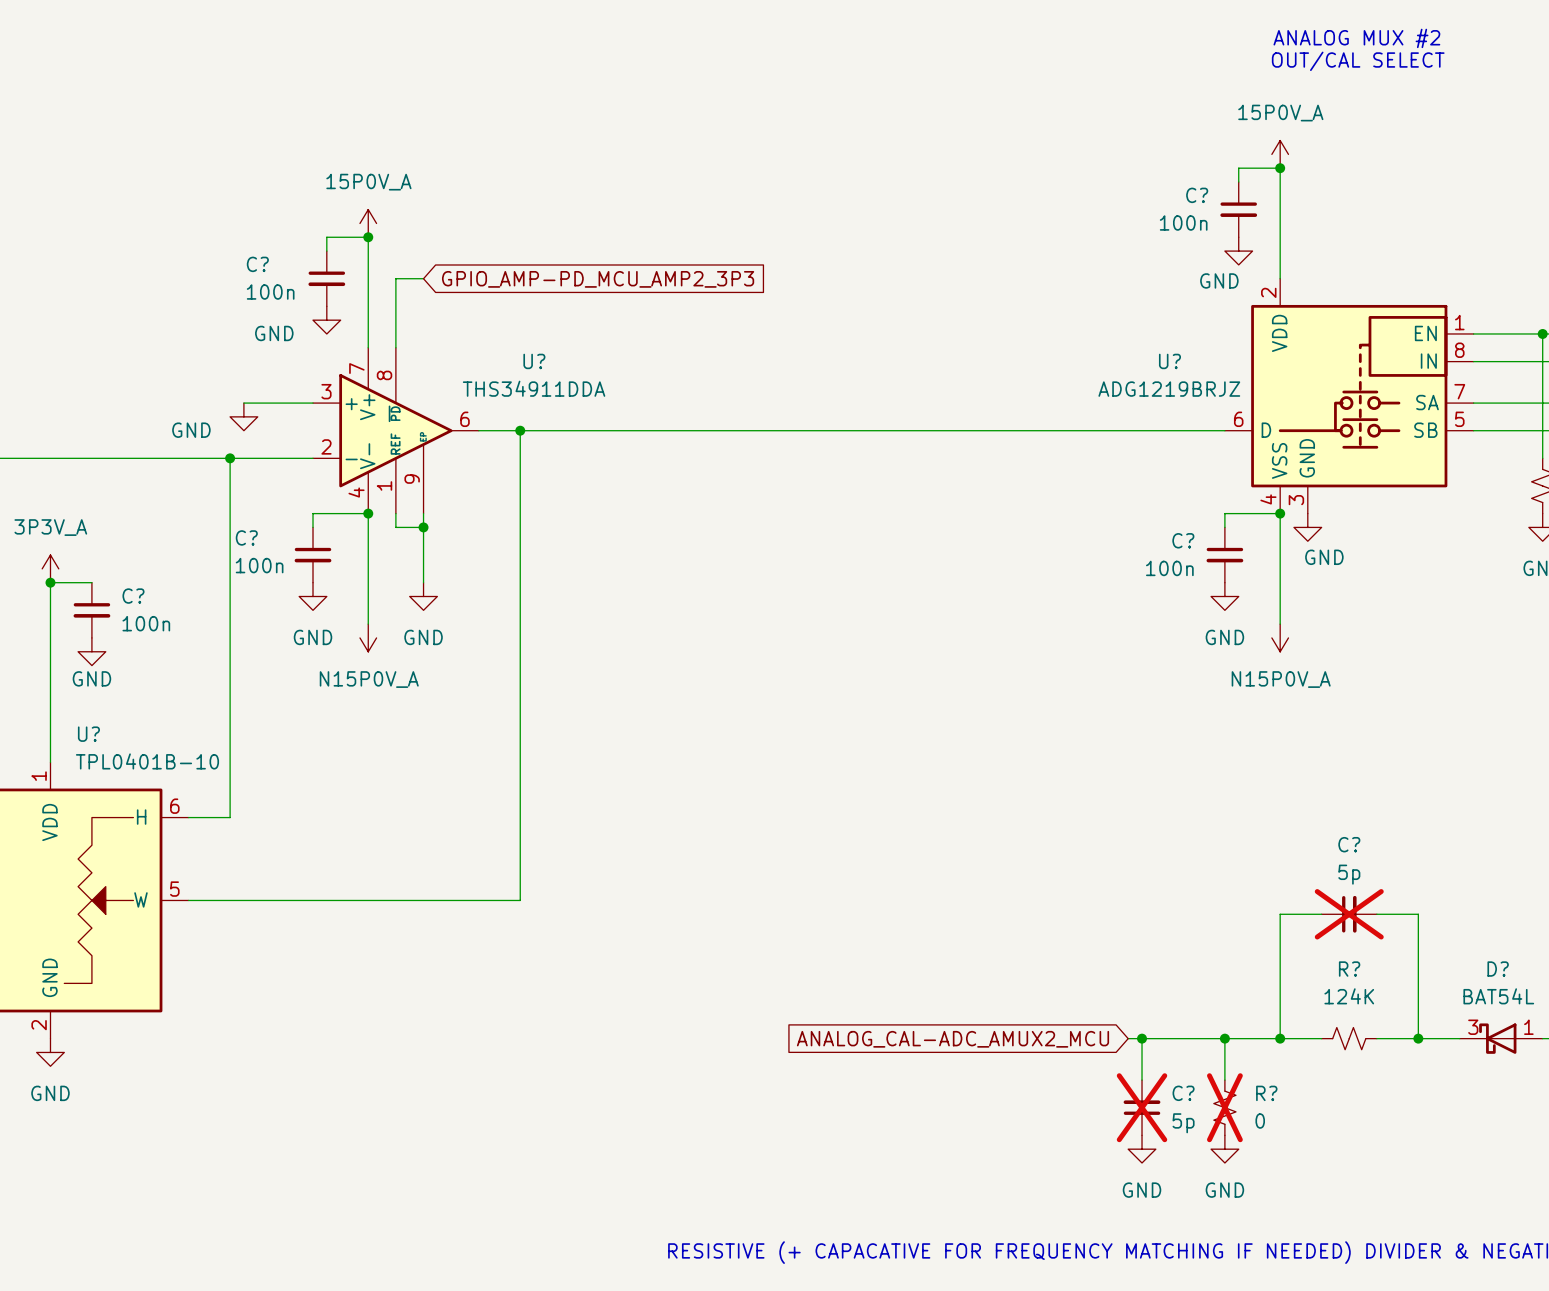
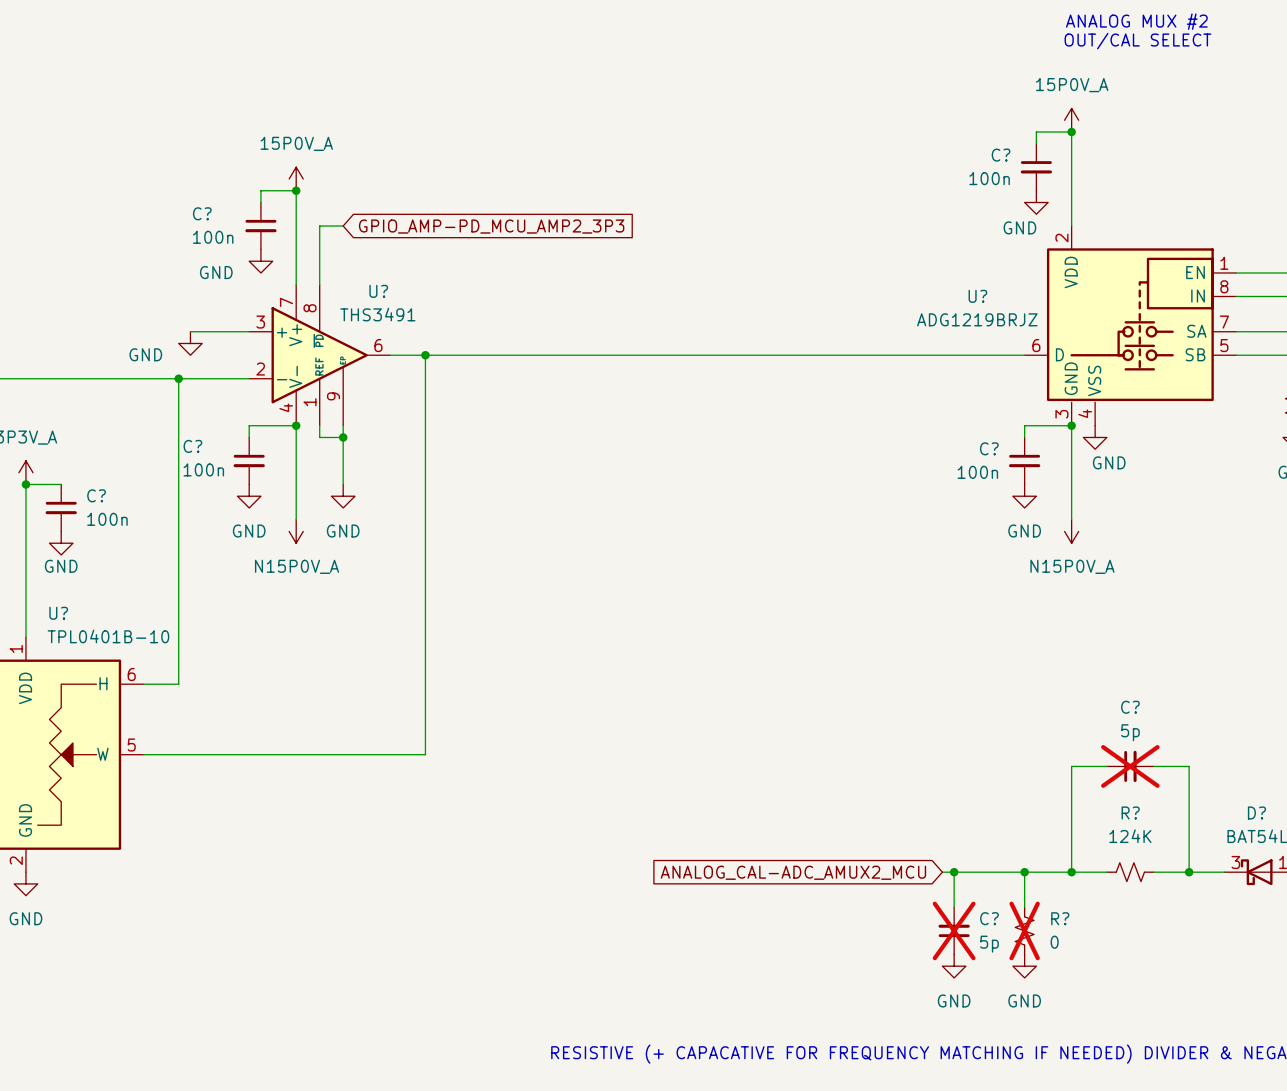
U? symbol: [1224, 278, 1474, 514] -> [1024, 225, 1237, 426]
U? name position: U? (534, 361) -> U? (378, 291)
U? value: THS34911DDA (534, 388) -> THS3491 (377, 314)

